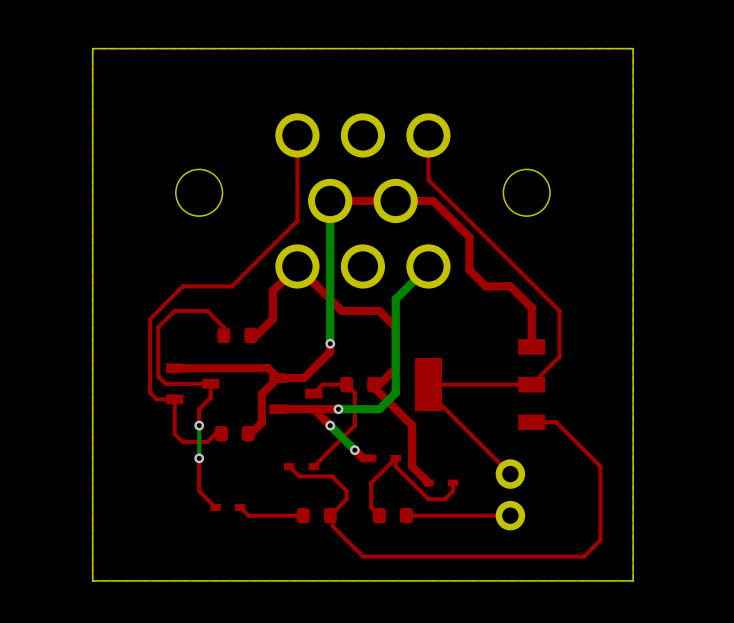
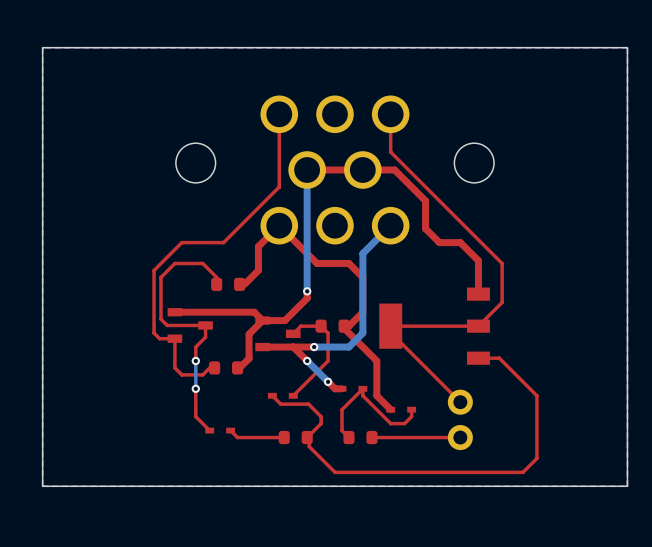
board edge: (633, 48) (92, 48) (92, 580) (633, 580) (633, 48) -> (627, 47) (627, 486) (42, 486) (42, 47) (627, 47)

